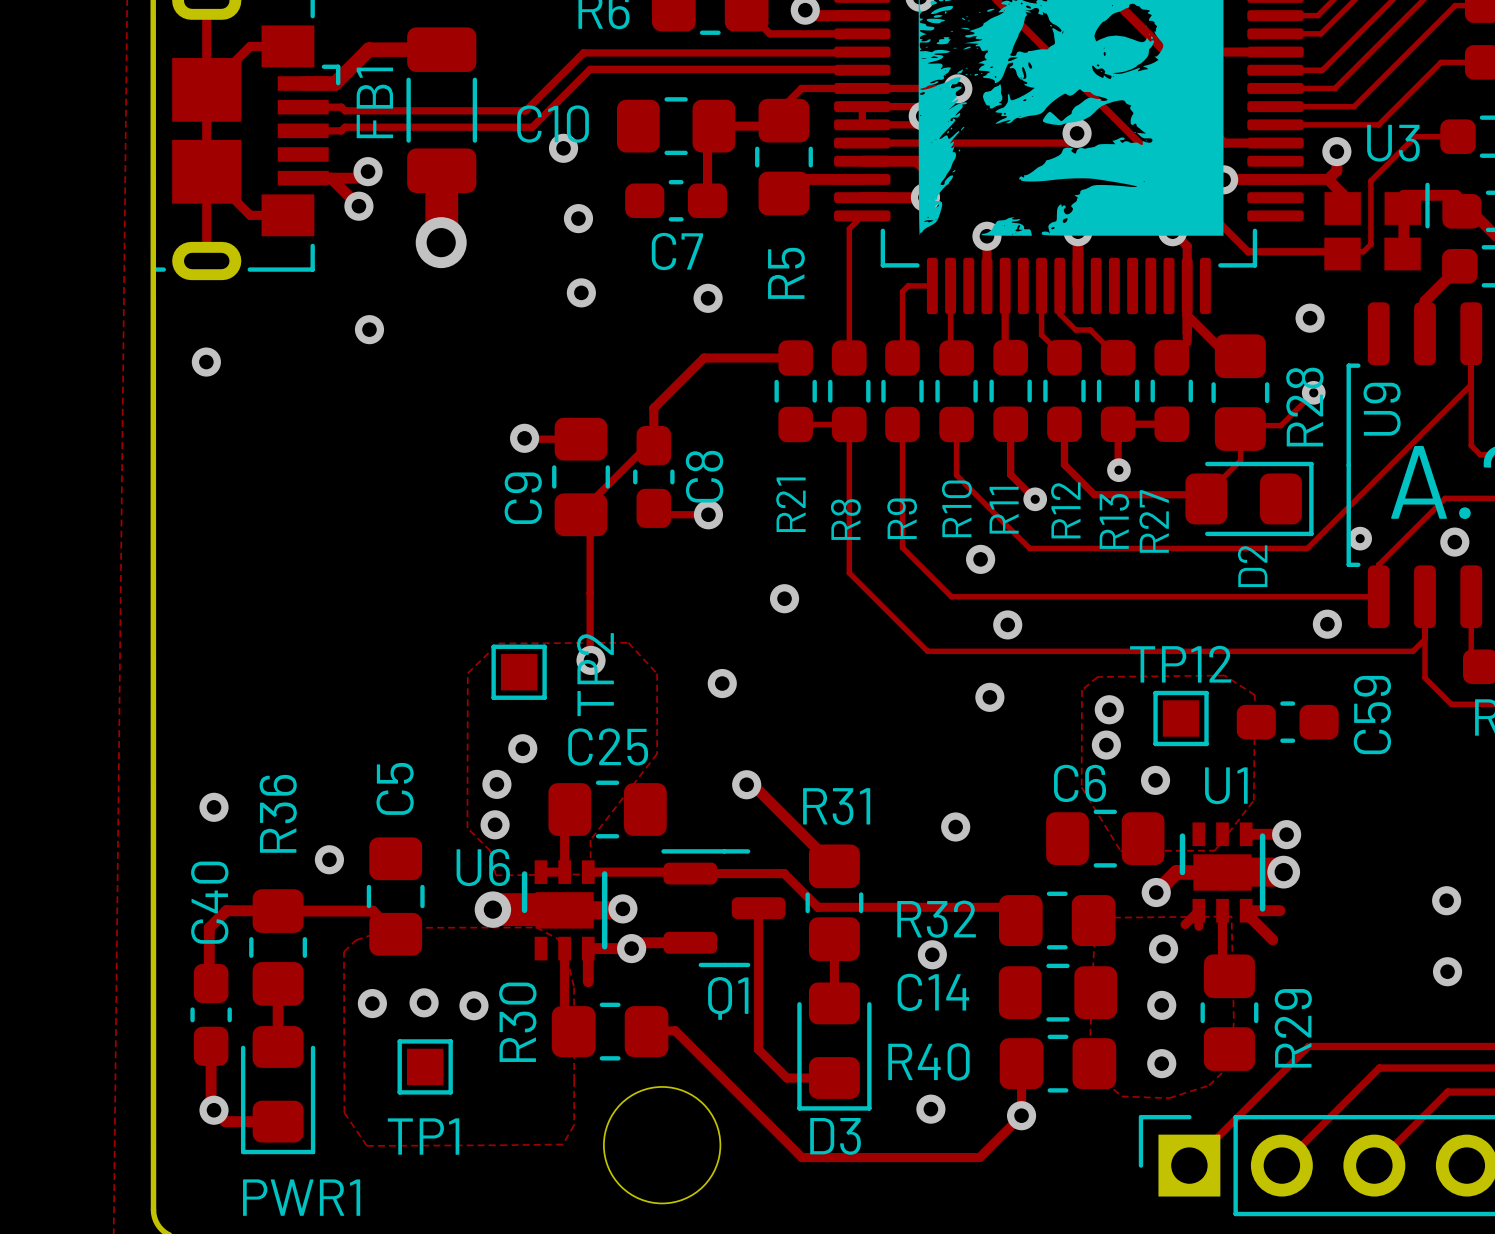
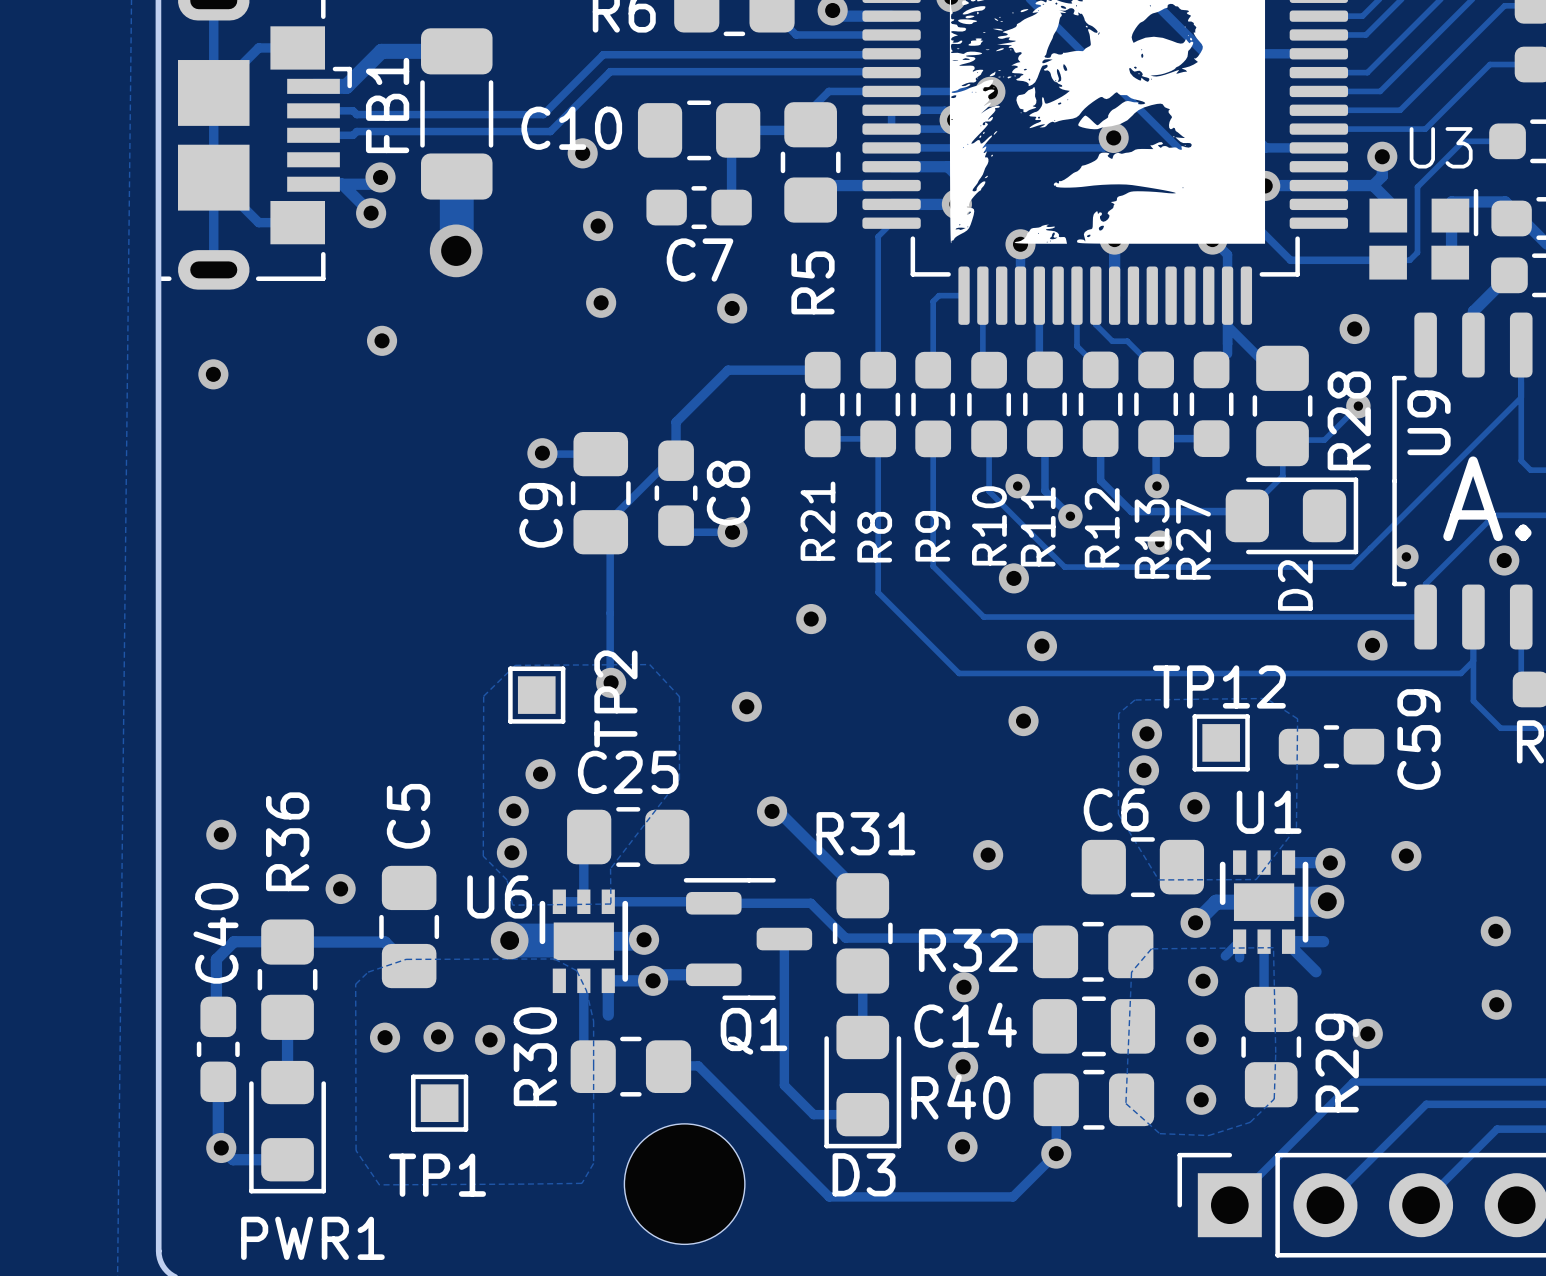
via: none -> (1017, 486)
via: none -> (1159, 542)
via: none -> (1406, 856)
via: none -> (1367, 1033)
via: none -> (963, 1066)

